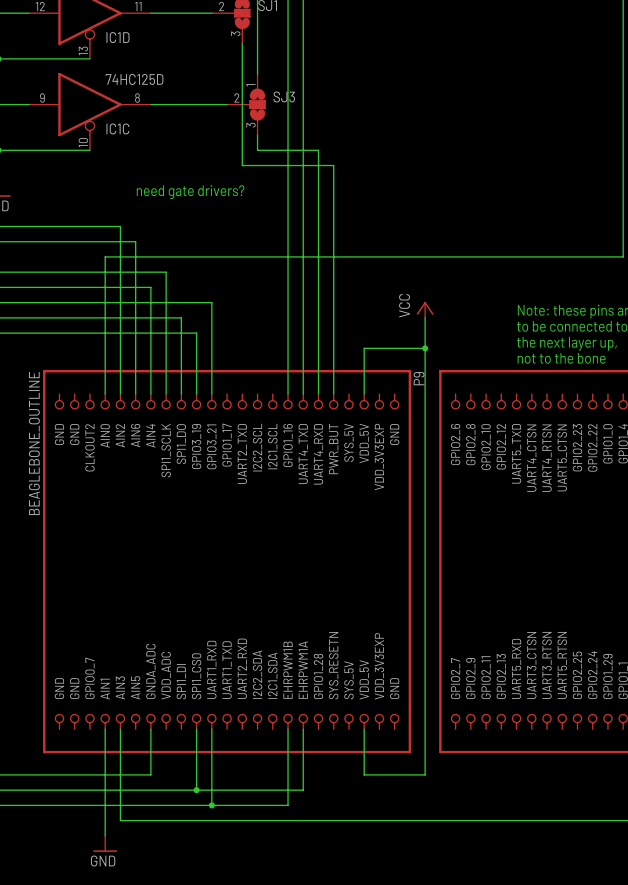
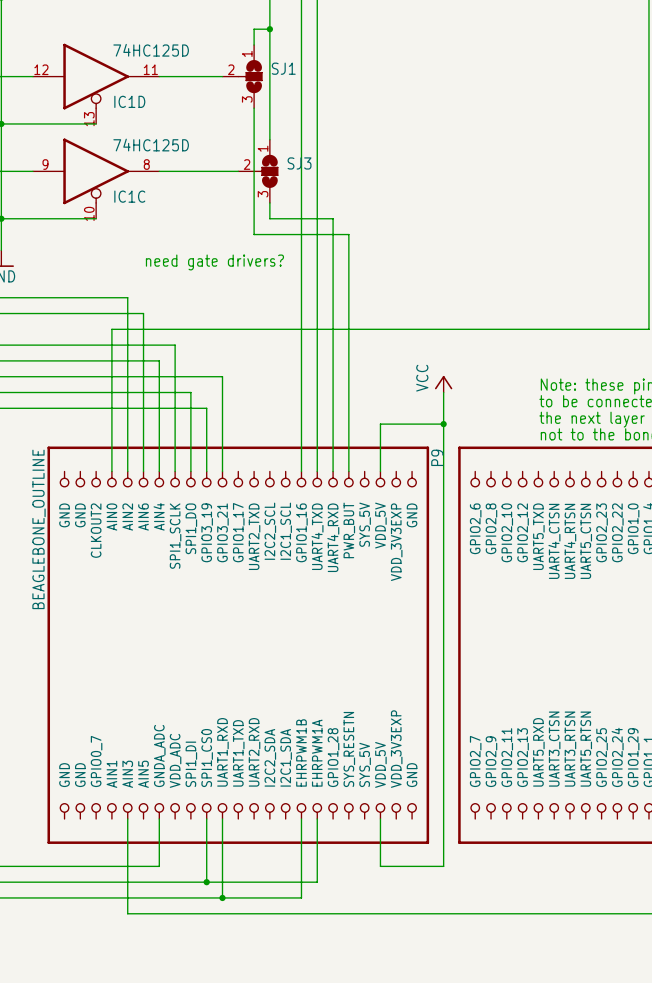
wire: (105, 729) (105, 835) -> none
power symbol: GND (105, 843) -> none

